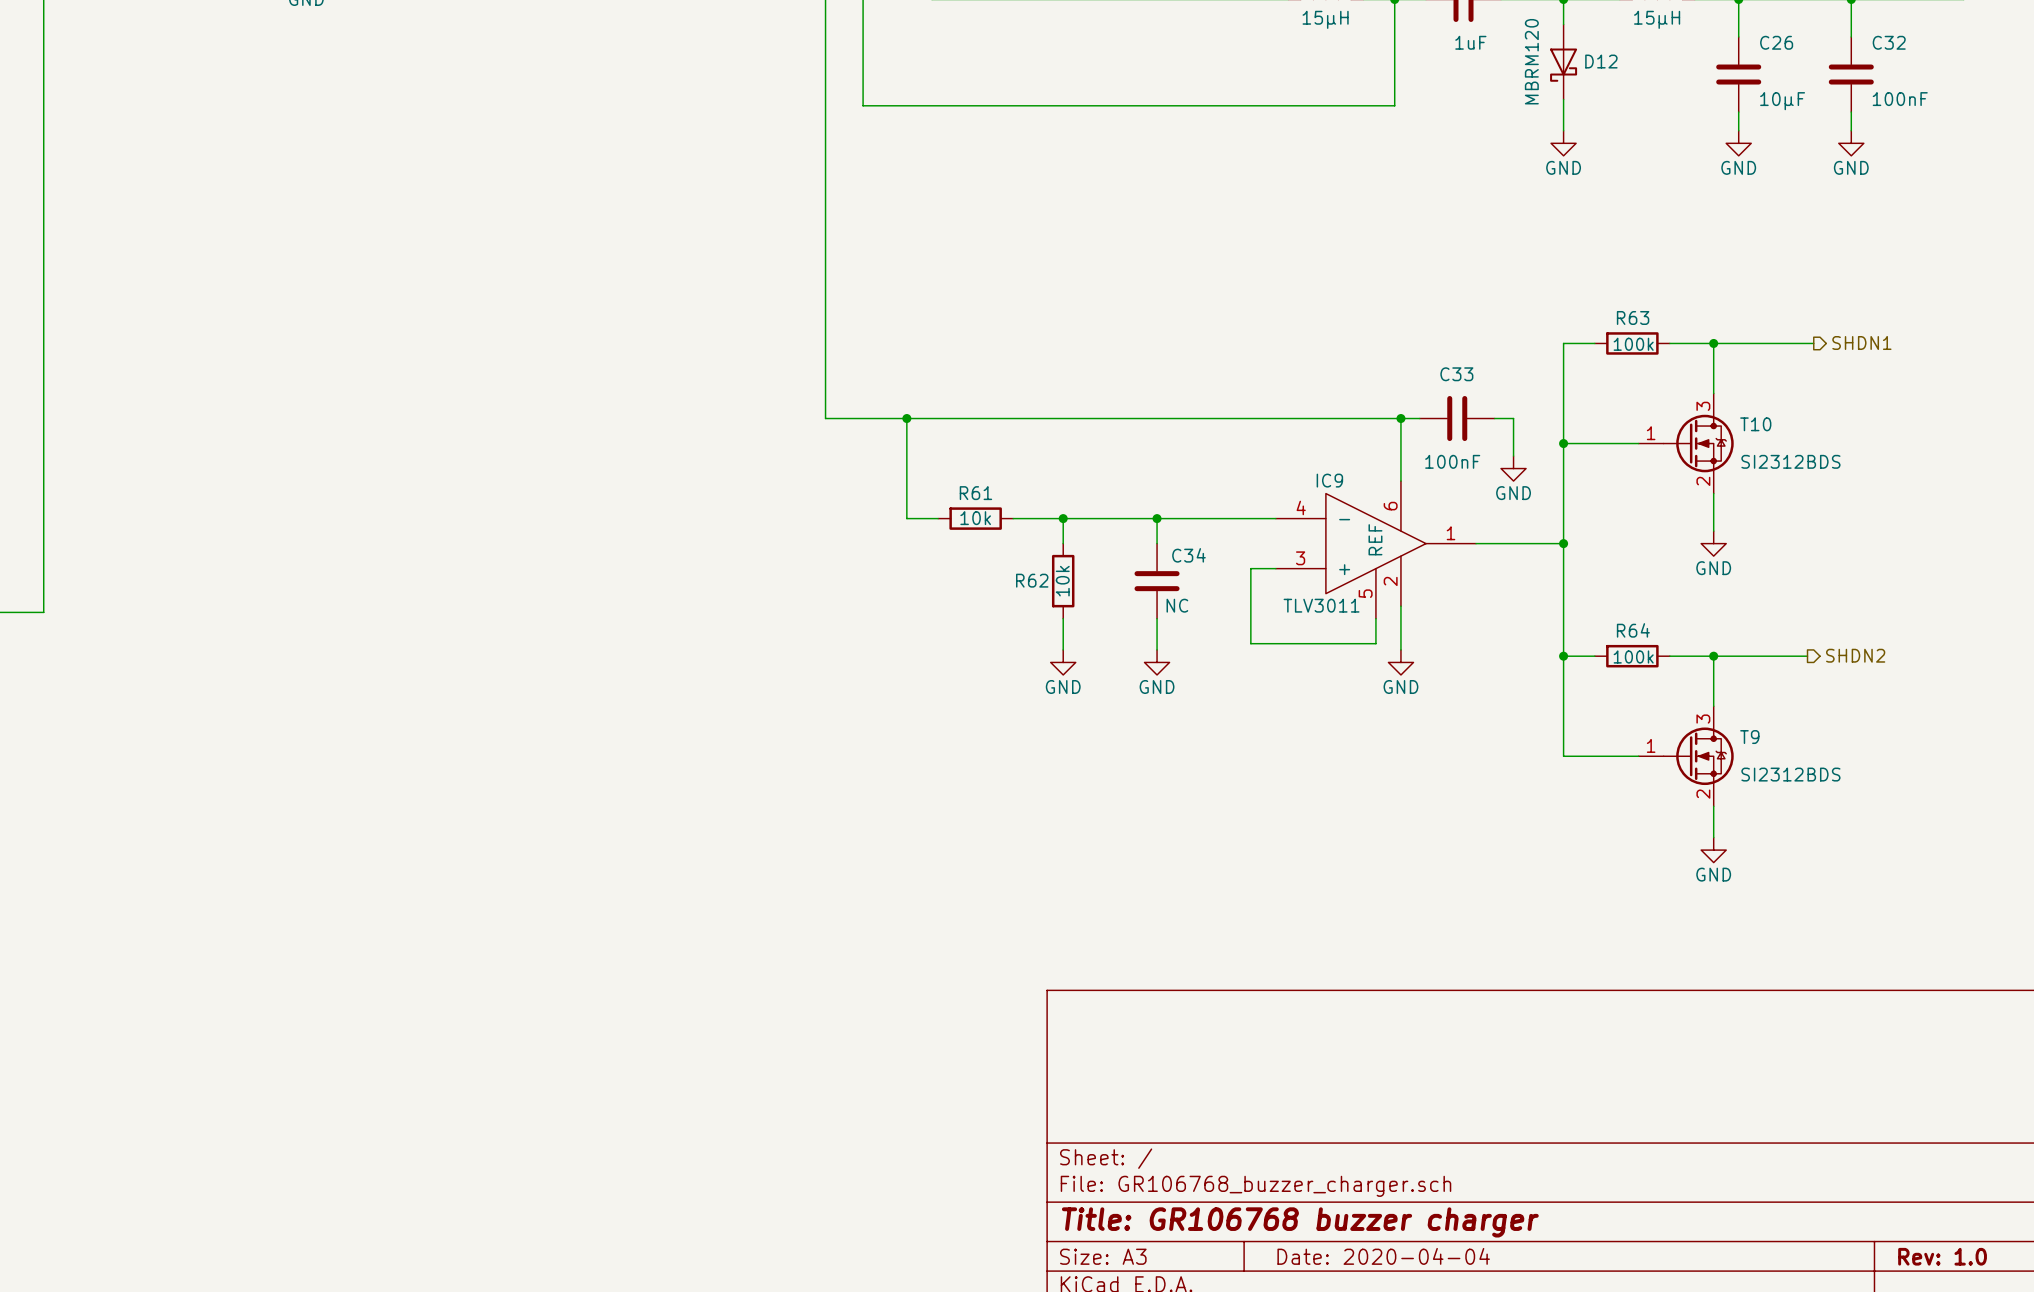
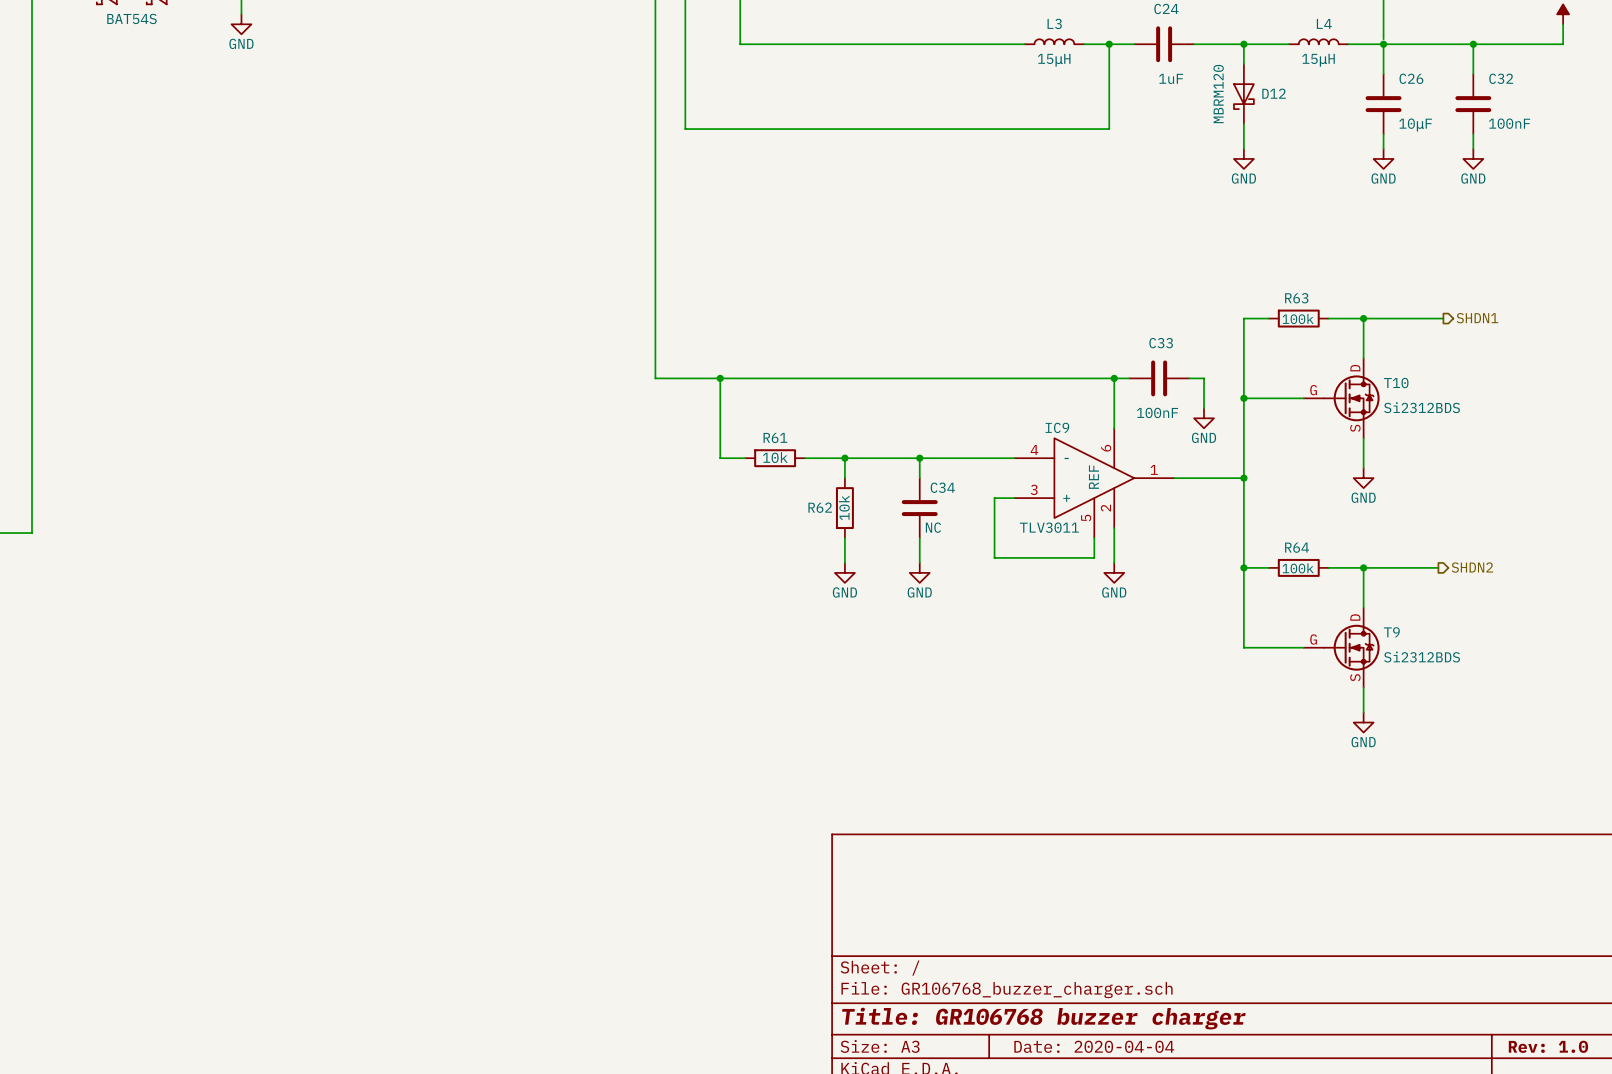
T10 pin number: 3 (1703, 406) -> D (1355, 368)
T10 pin number: 1 (1651, 433) -> G (1313, 390)
T10 value: SI2312BDS (1790, 461) -> Si2312BDS (1422, 407)
T10 pin number: 2 (1703, 481) -> S (1355, 428)
T9 pin number: 3 (1703, 719) -> D (1355, 617)
T9 pin number: 1 (1651, 745) -> G (1313, 639)
T9 value: SI2312BDS (1790, 774) -> Si2312BDS (1422, 657)
T9 pin number: 2 (1703, 794) -> S (1355, 677)

